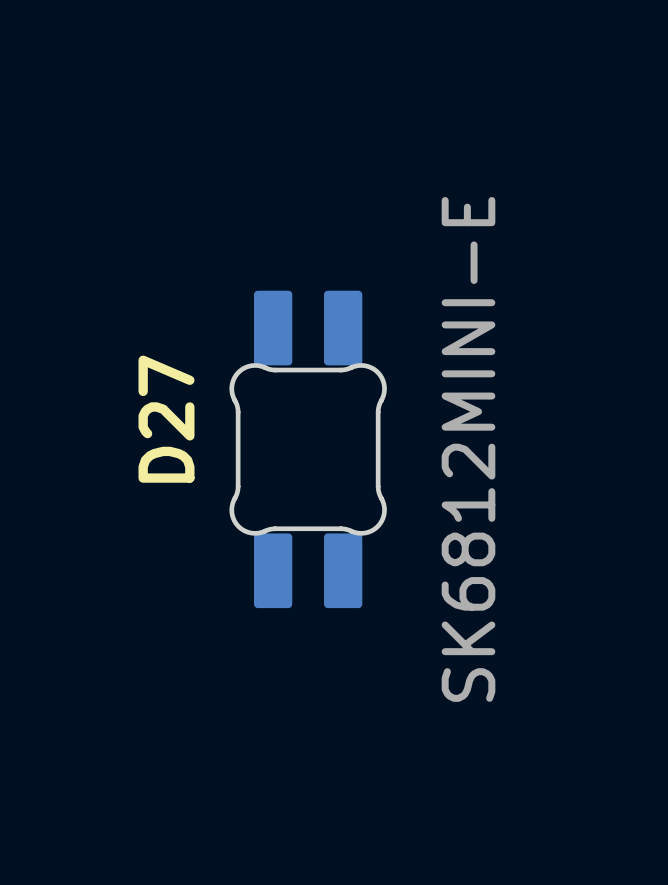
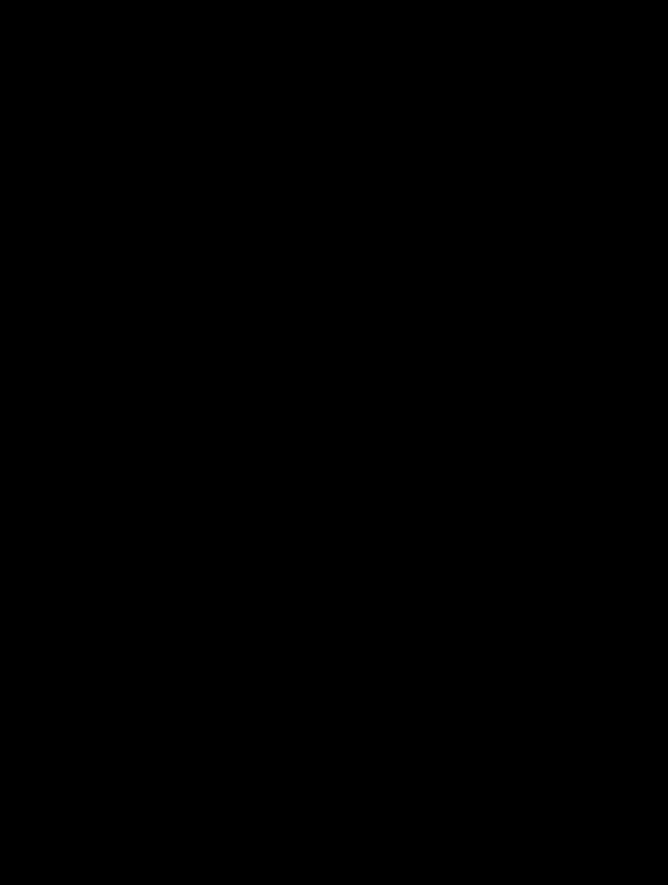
D27: SK6812MINI-E (308, 449) -> none

